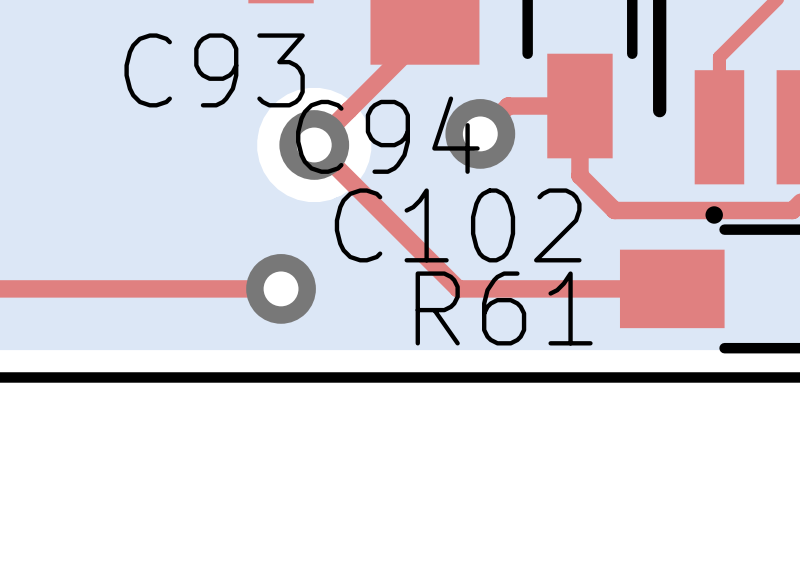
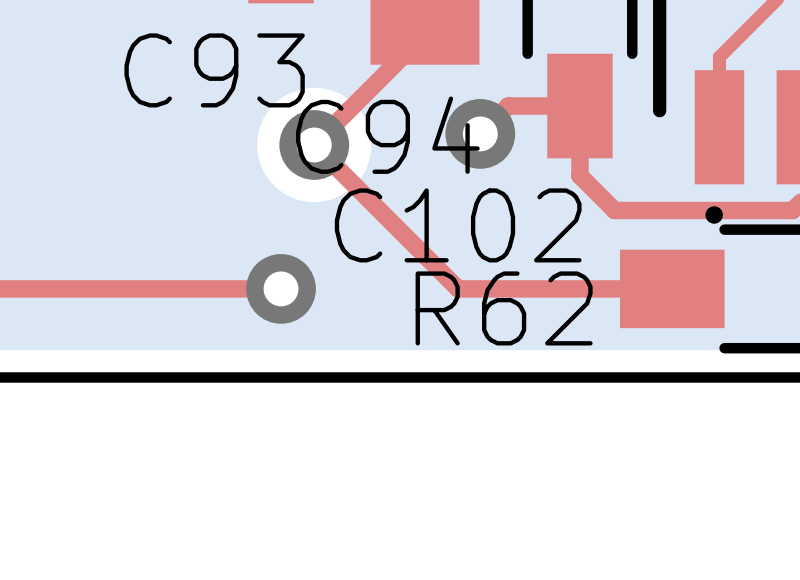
R61 name: R61 (504, 308) -> R62 (504, 308)

